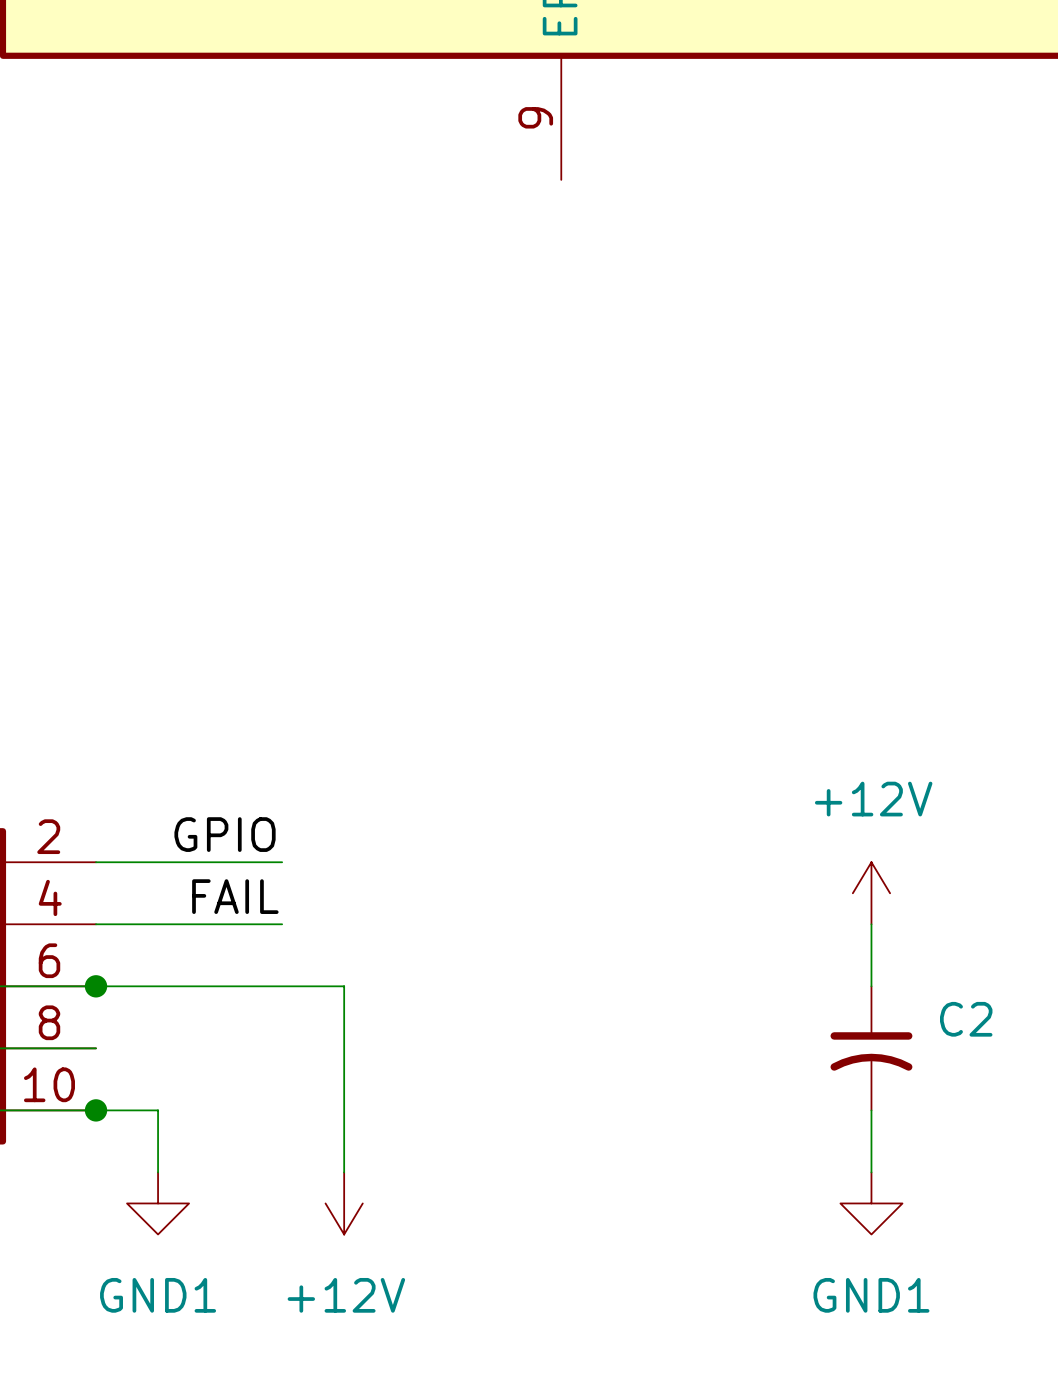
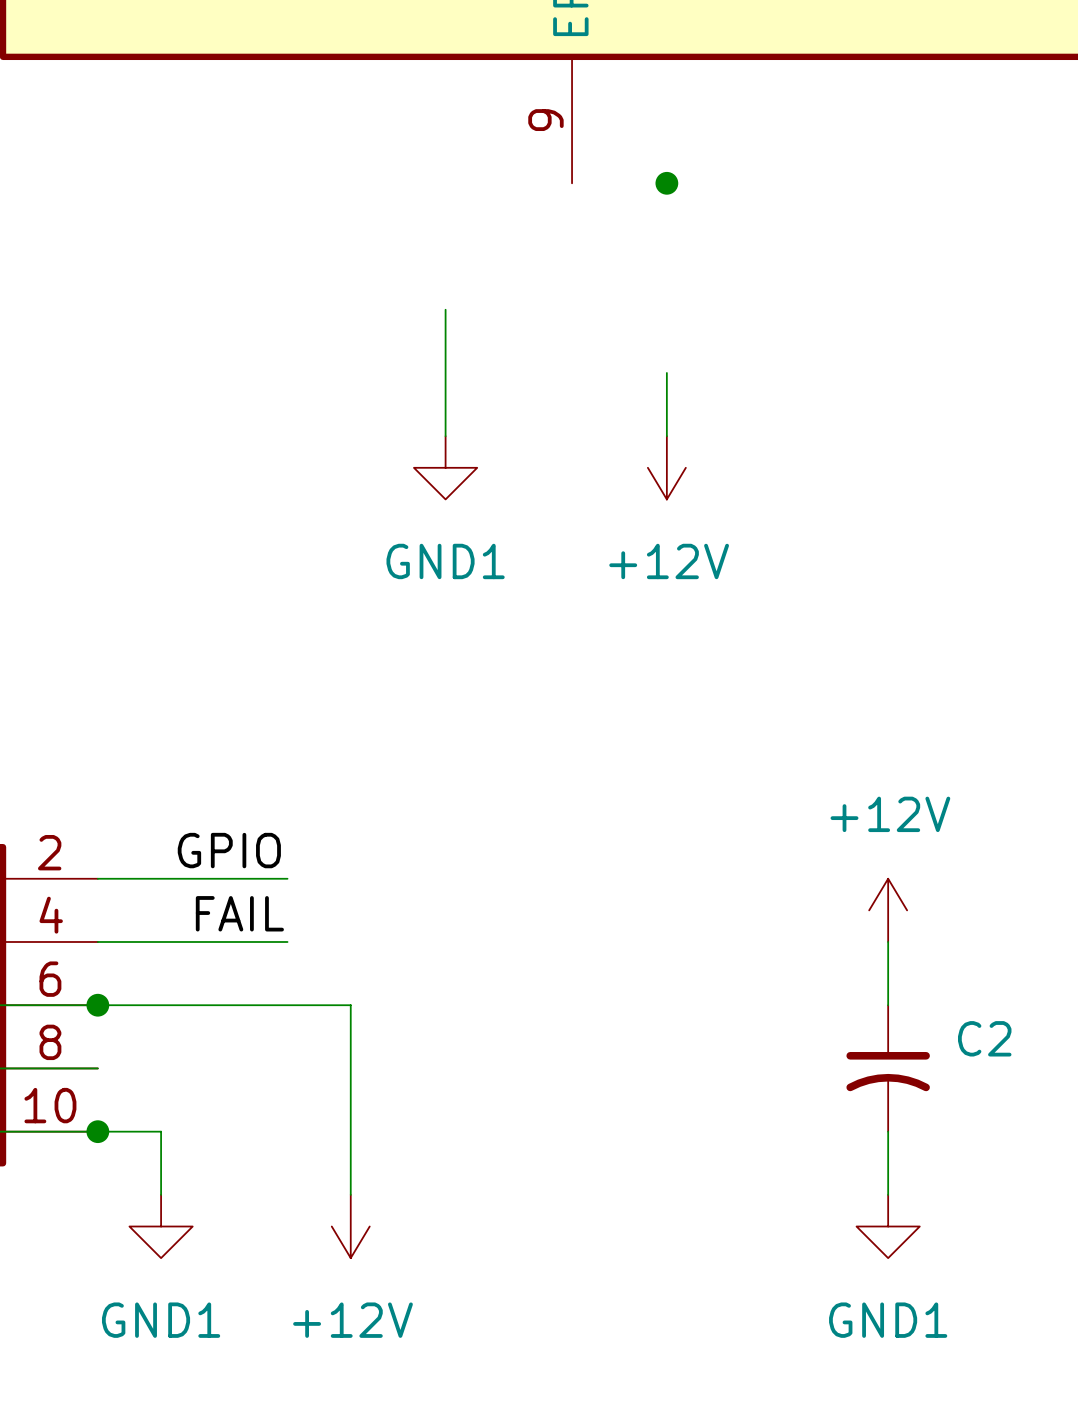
junction: none -> (666, 183)
wire: none -> (445, 309) (445, 436)
wire: none -> (666, 372) (666, 436)
power symbol: none -> GND1 (445, 467)
power symbol: none -> +12V (666, 467)

